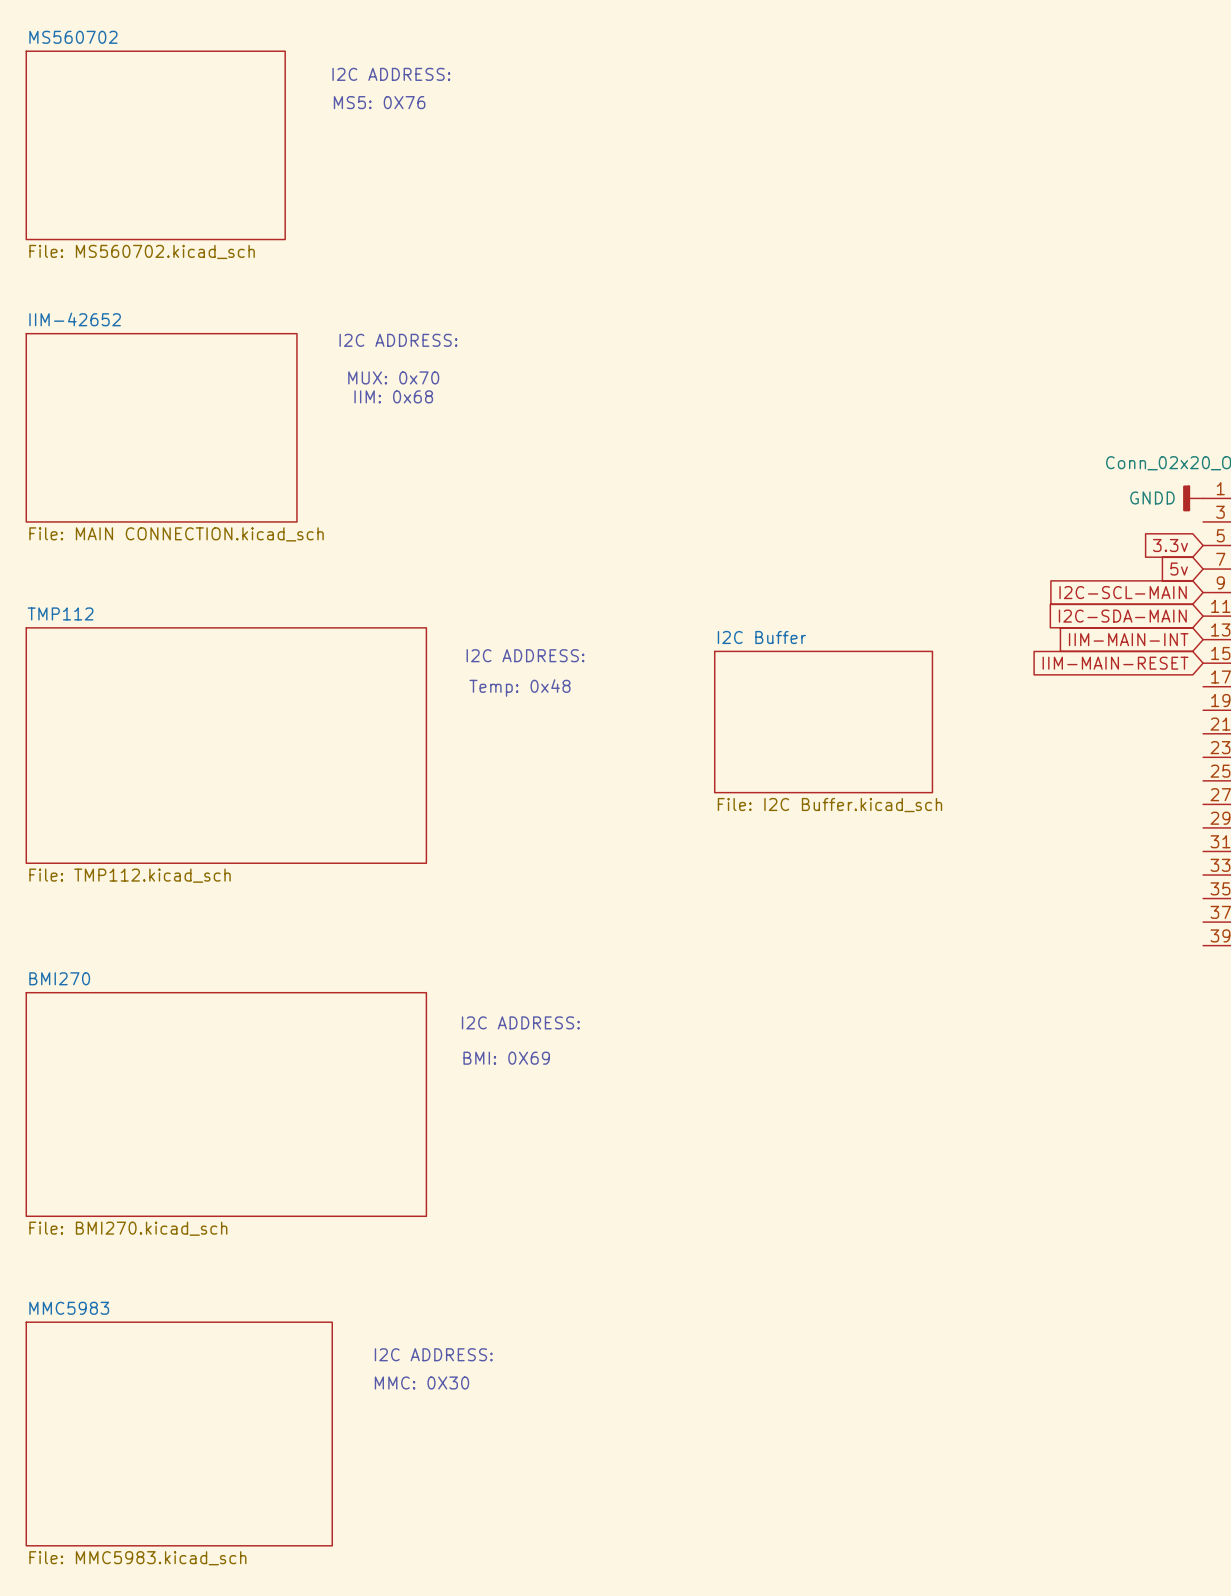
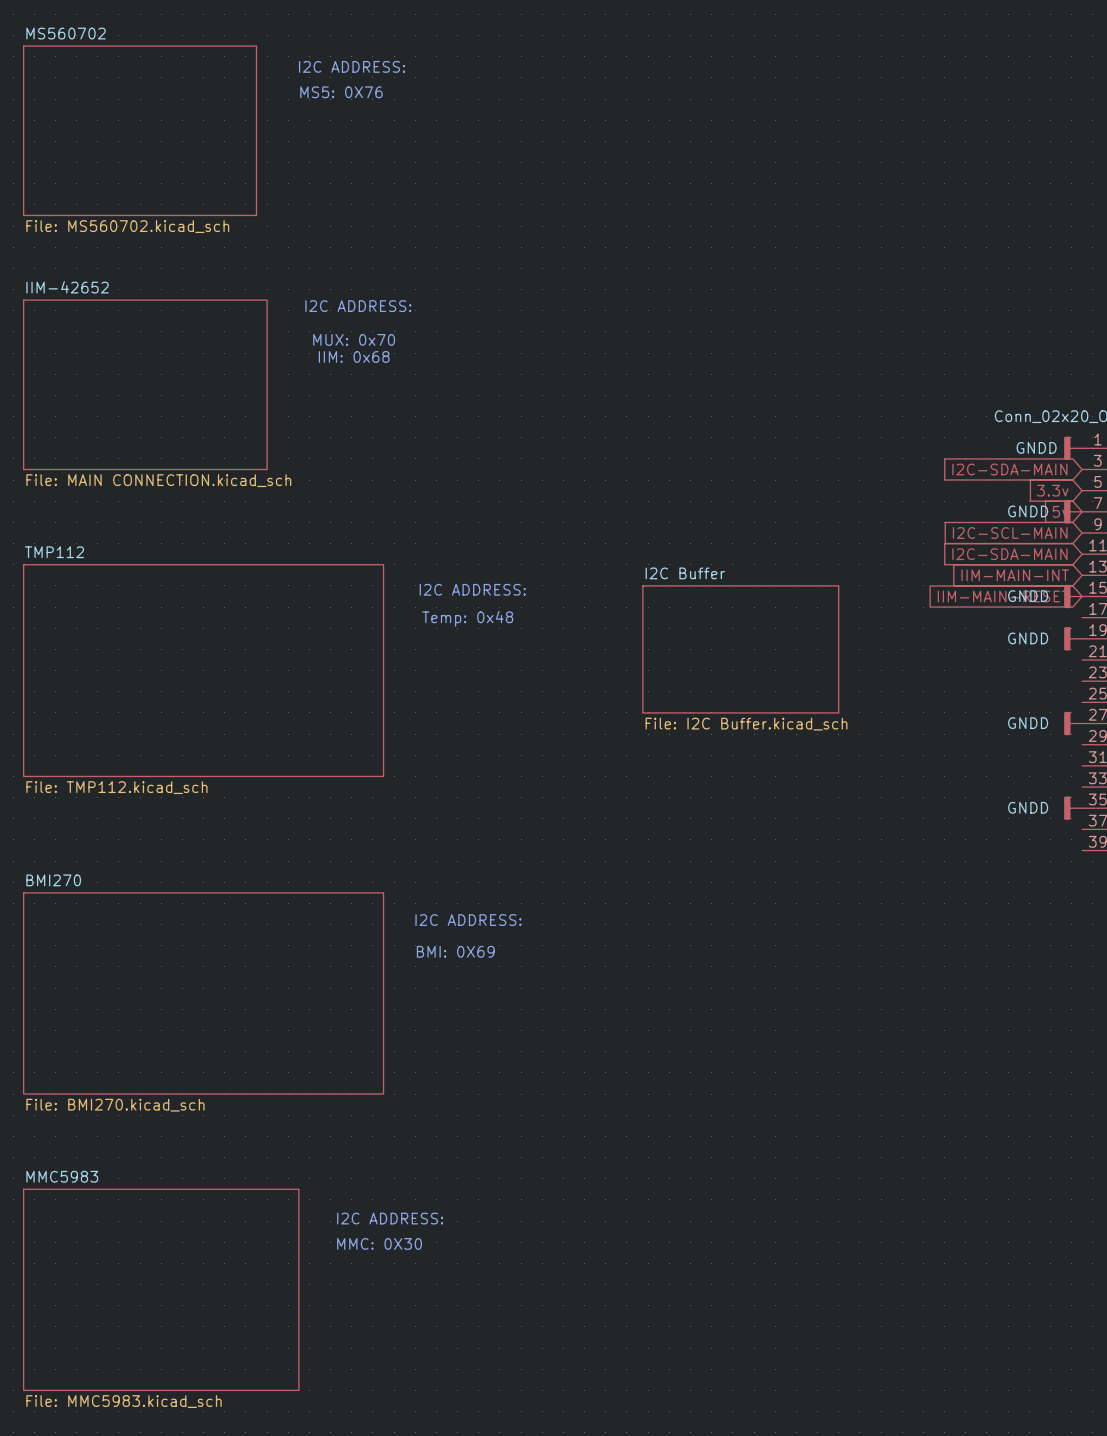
global label: none -> I2C-SDA-MAIN (1009, 469)
power symbol: none -> GNDD (1073, 511)
power symbol: none -> GNDD (1073, 596)
power symbol: none -> GNDD (1073, 638)
power symbol: none -> GNDD (1073, 723)
power symbol: none -> GNDD (1073, 808)

